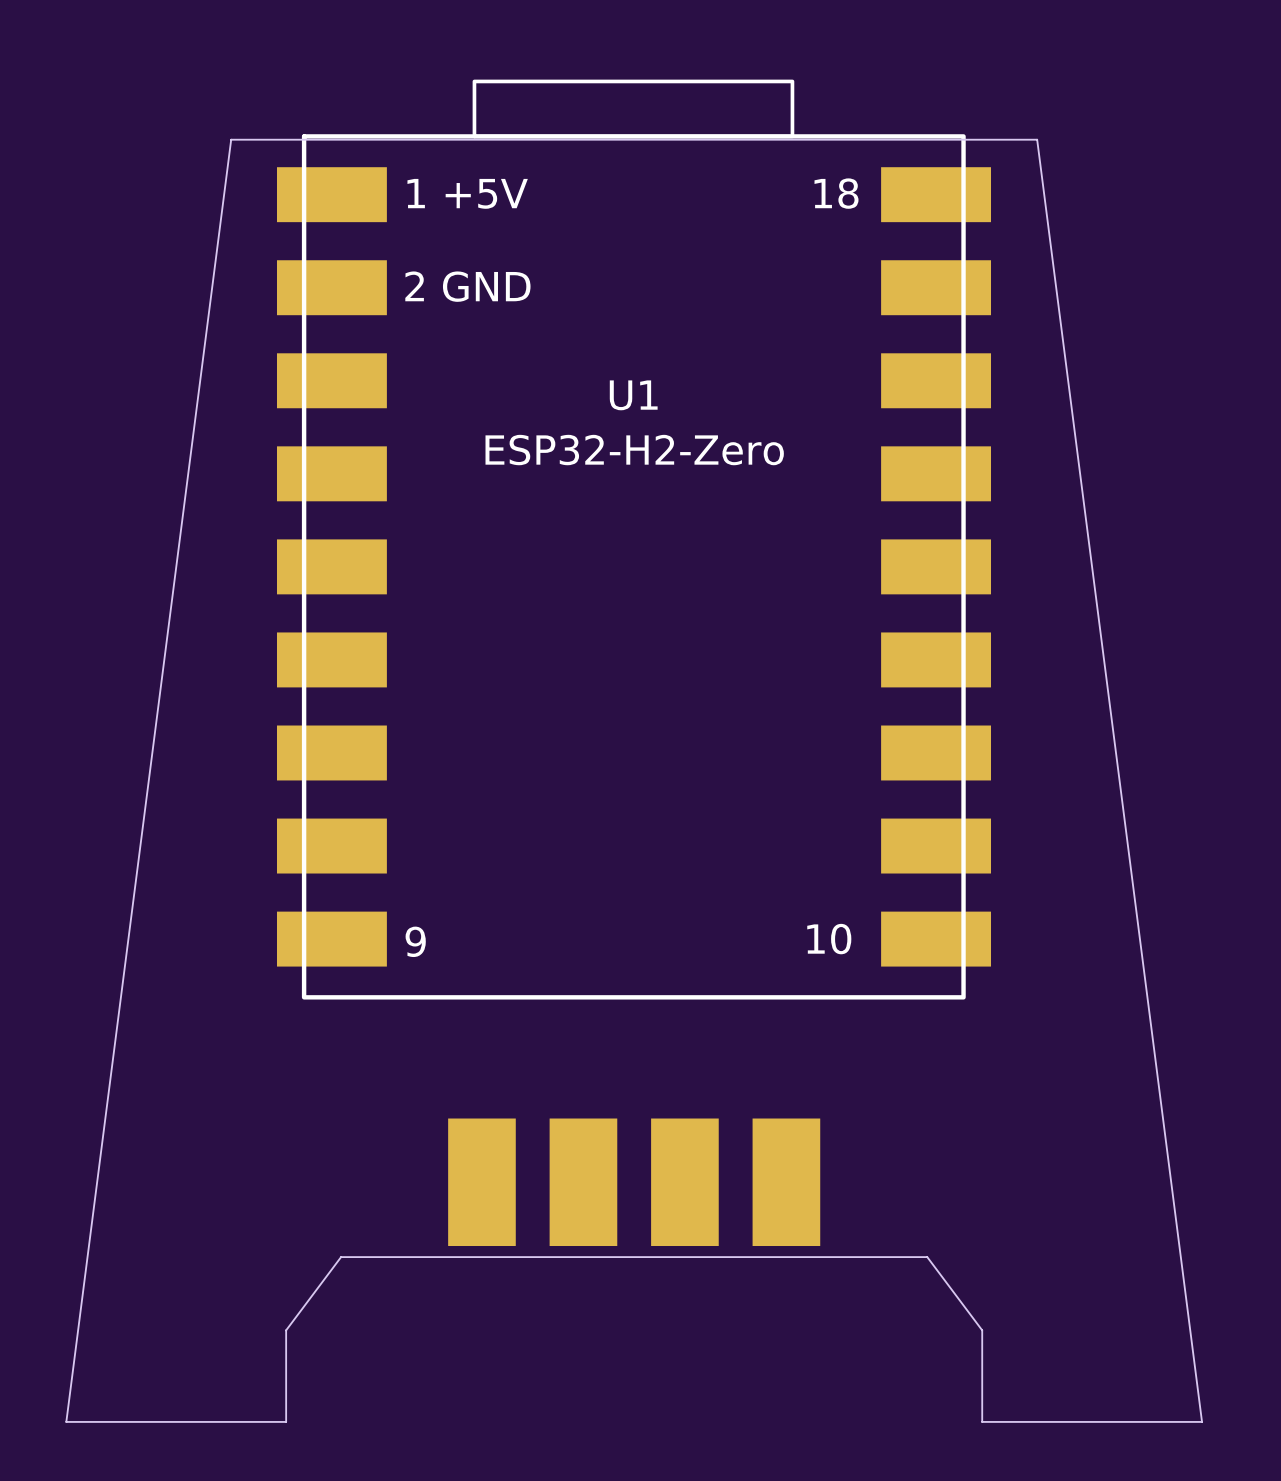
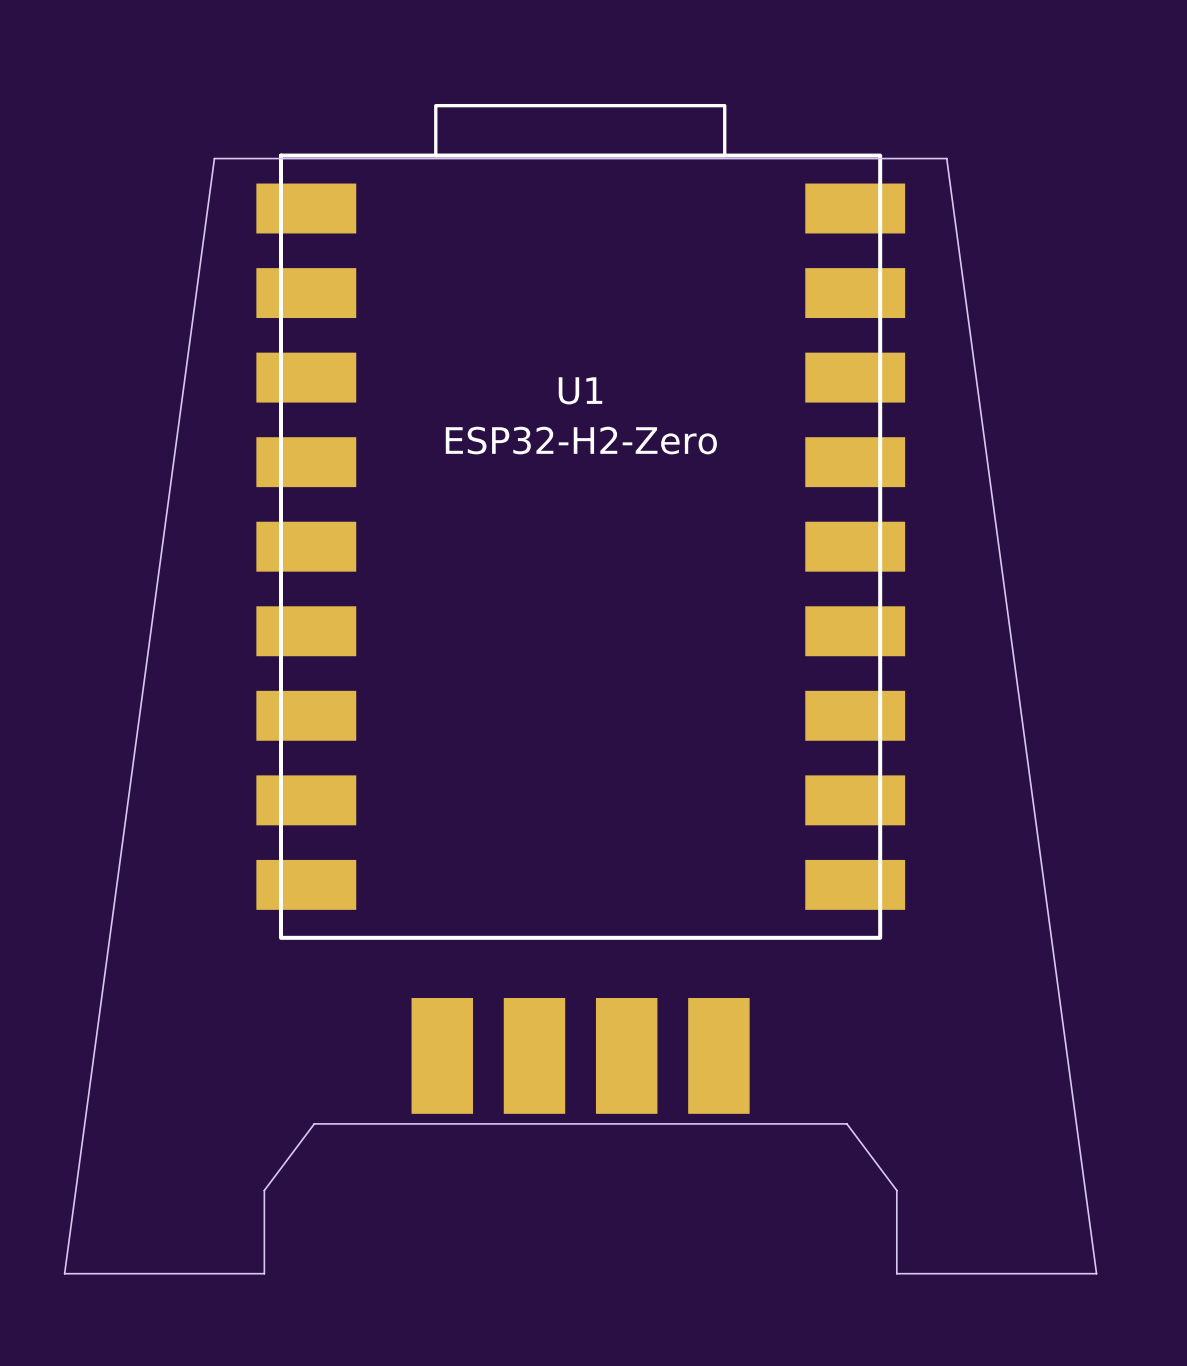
text: 1 +5V (467, 193) -> none
text: 18 (836, 193) -> none
text: 2 GND (467, 286) -> none
U1 position: (634, 539) -> (580, 521)
text: 10 (829, 939) -> none
text: 9 (415, 941) -> none
board edge: (1202, 1421) (1037, 139) (231, 139) (66, 1421) -> (1096, 1273) (946, 158) (214, 158) (64, 1273)

